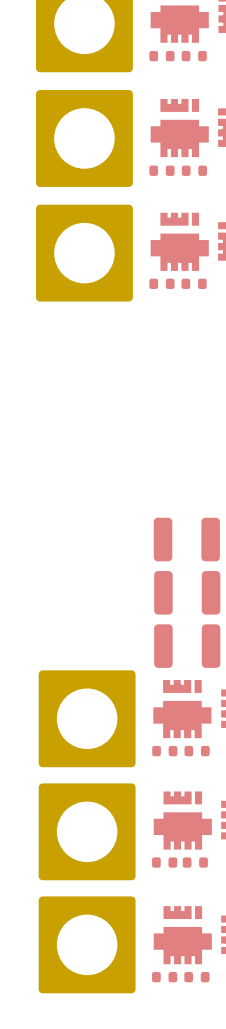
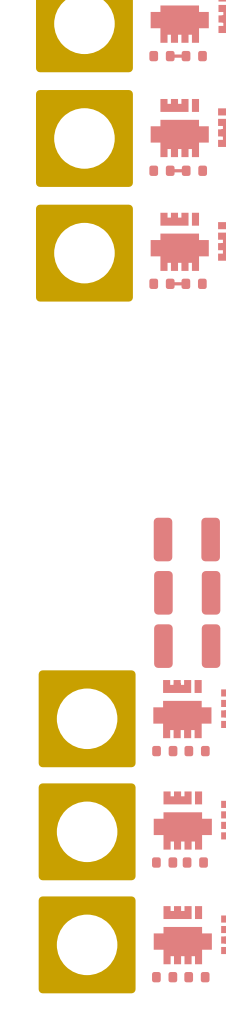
top track: none -> (186, 56) (170, 56)
top track: none -> (186, 170) (170, 170)
top track: none -> (185, 283) (170, 283)

